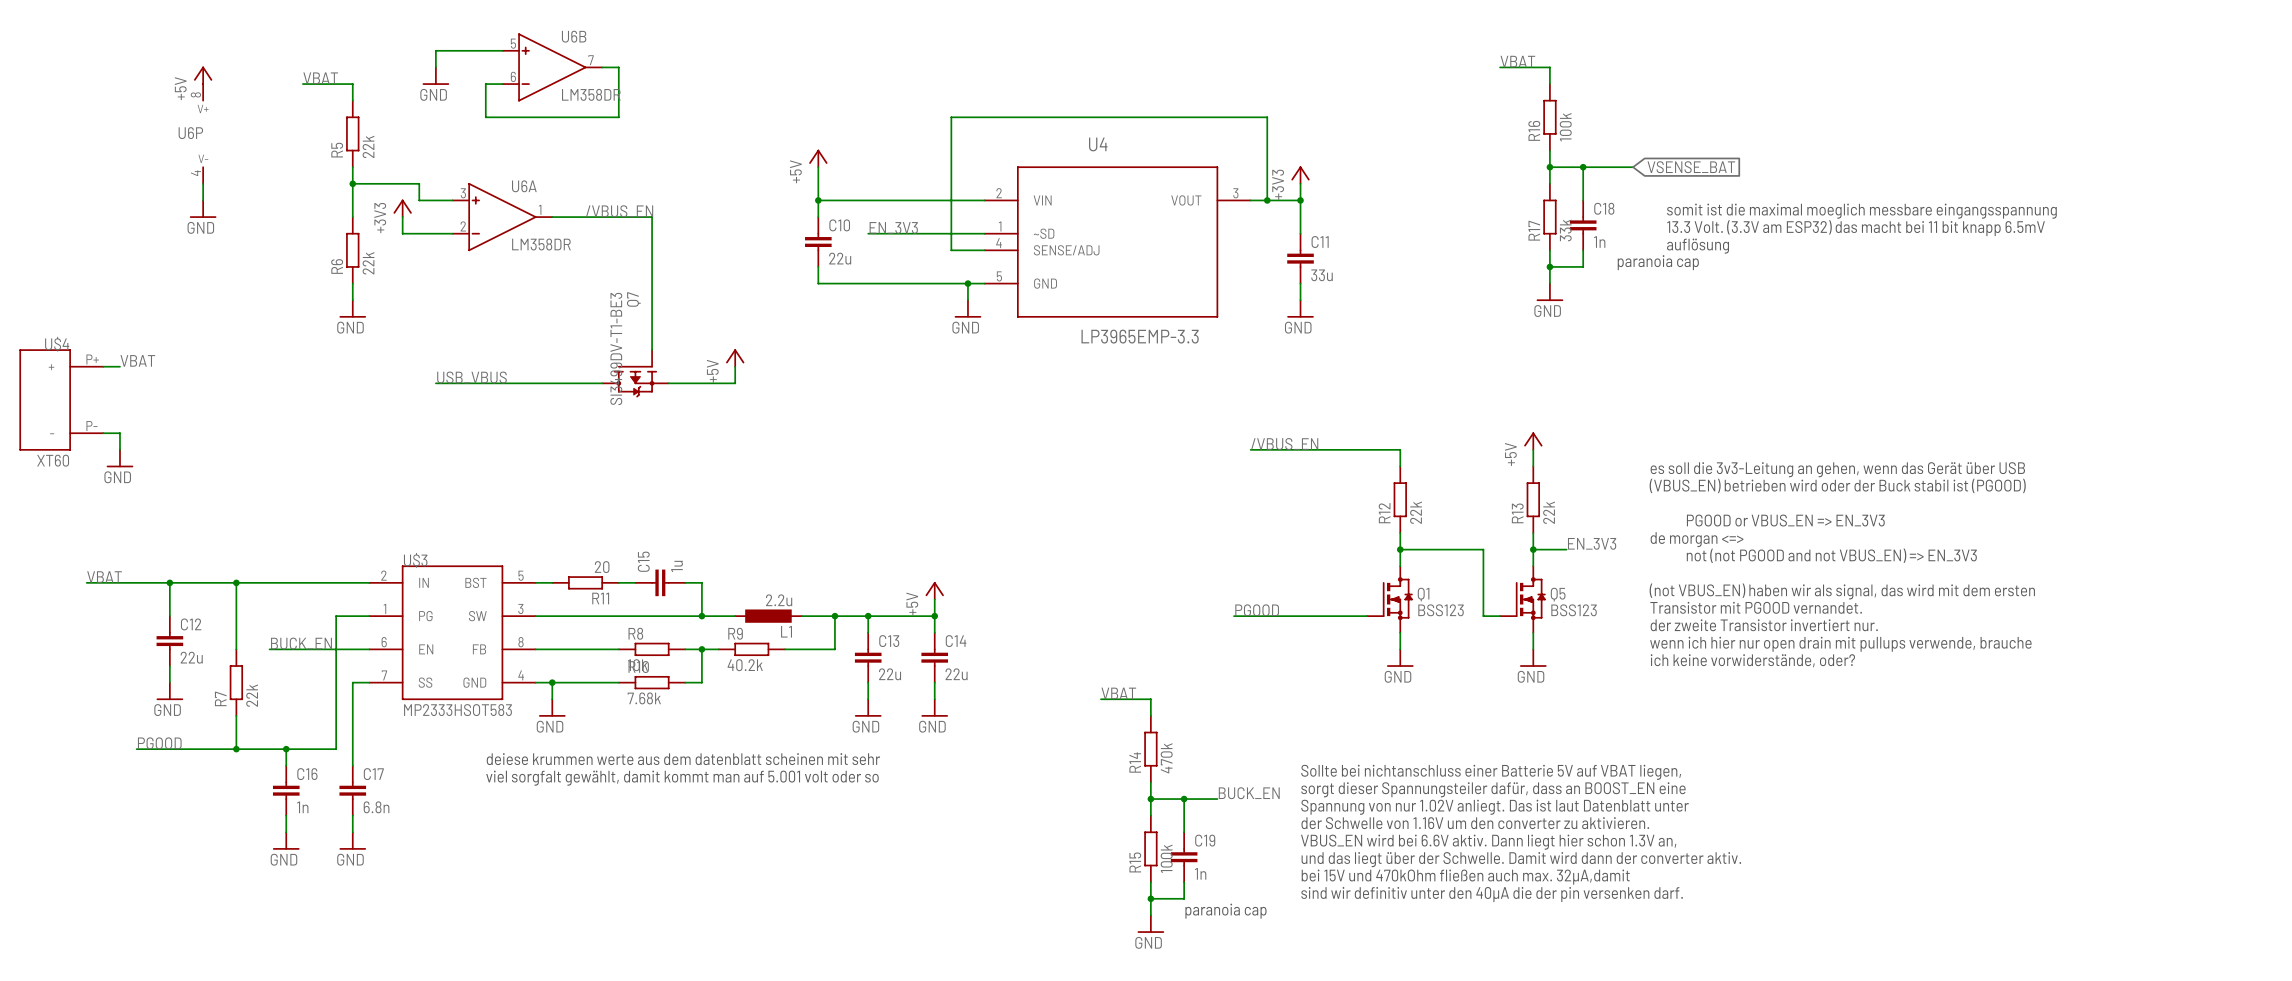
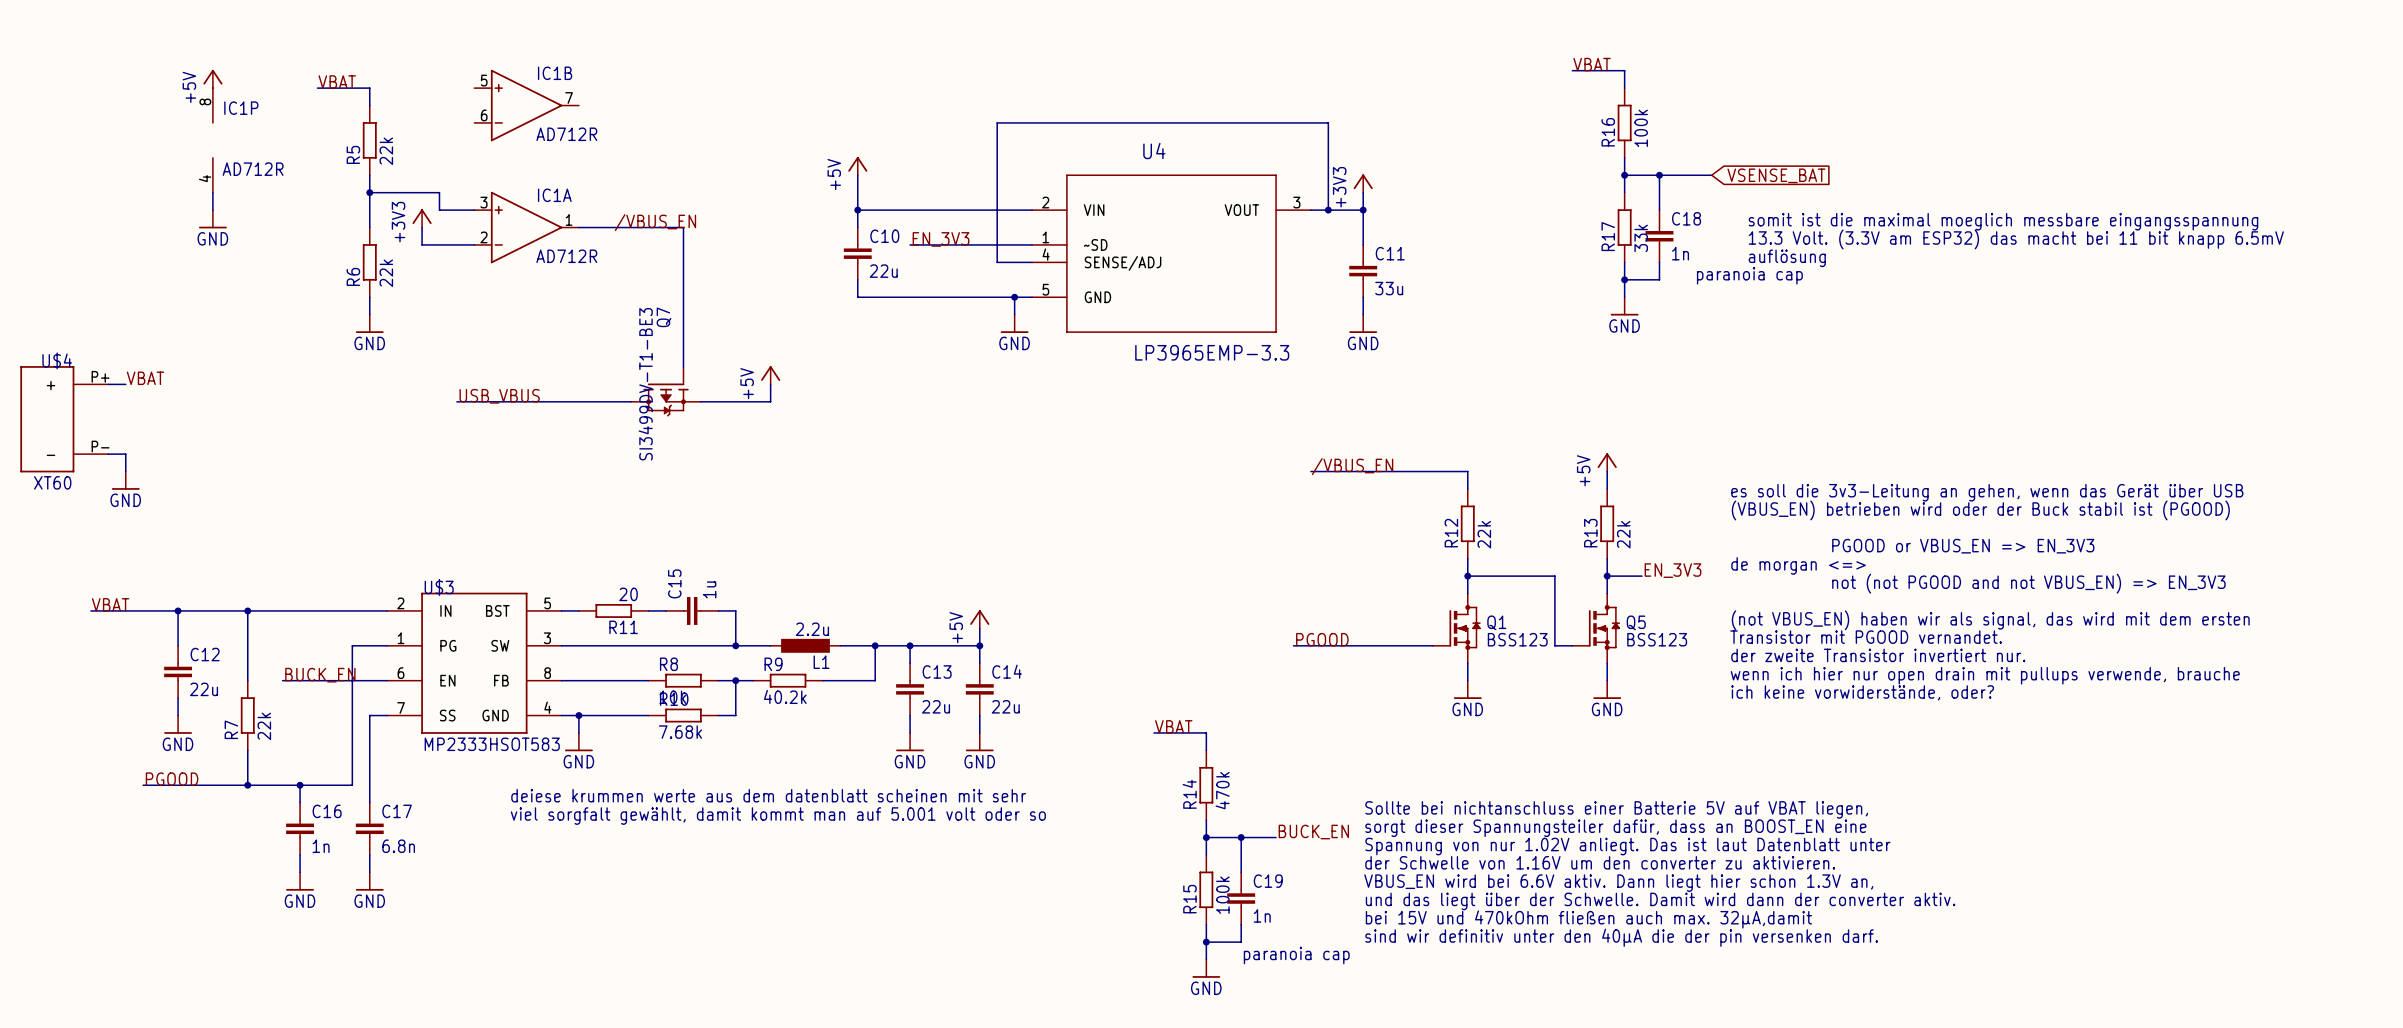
wire: (502, 50) (435, 50) (435, 67) -> none
U6B: LM358DR (552, 67) -> none
wire: (602, 67) (618, 67) (618, 117) (485, 117) (485, 84) (502, 84) -> none
power symbol: GND (435, 76) -> none
IC1B: none -> AD712R (526, 105)
U6P: (203, 133) -> none
IC1P: none -> AD712R (212, 140)
U6A name: U6A (524, 186) -> IC1A (554, 195)
U6A value: LM358DR (541, 244) -> AD712R (566, 256)

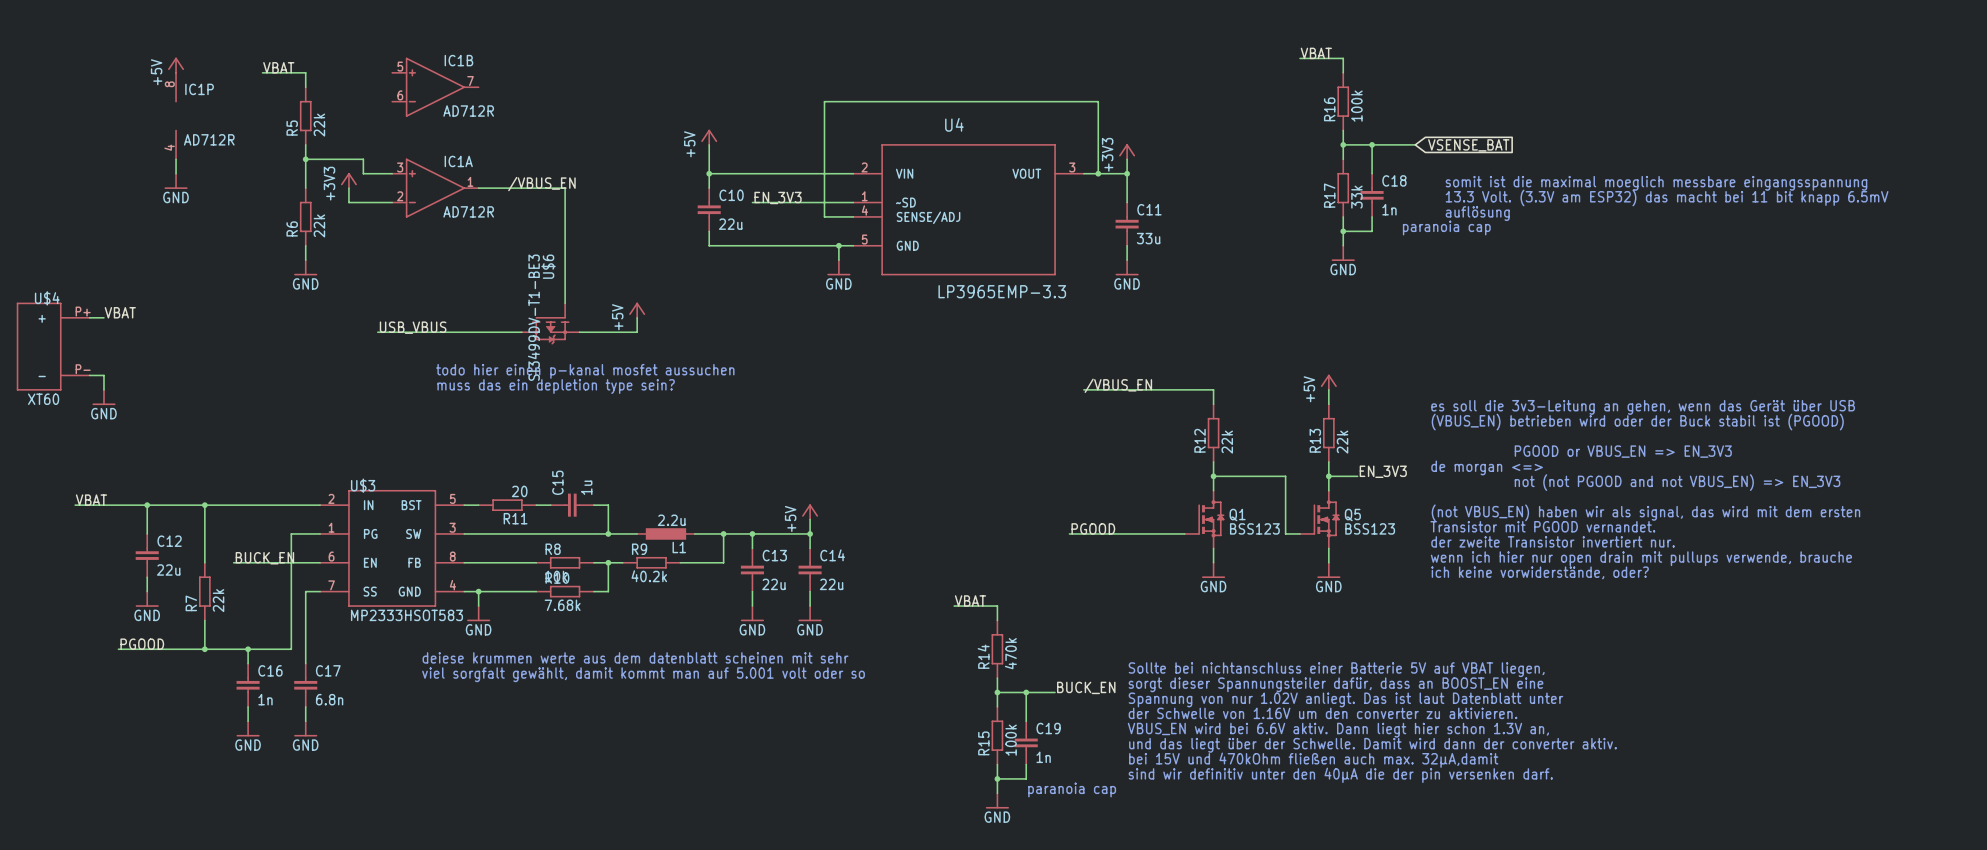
Q7 name: Q7 (664, 317) -> U$6 (548, 266)
text: none -> todo hier einen p-kanal mosfet aussuchen (585, 371)
text: none -> muss das ein depletion type sein? (556, 386)

